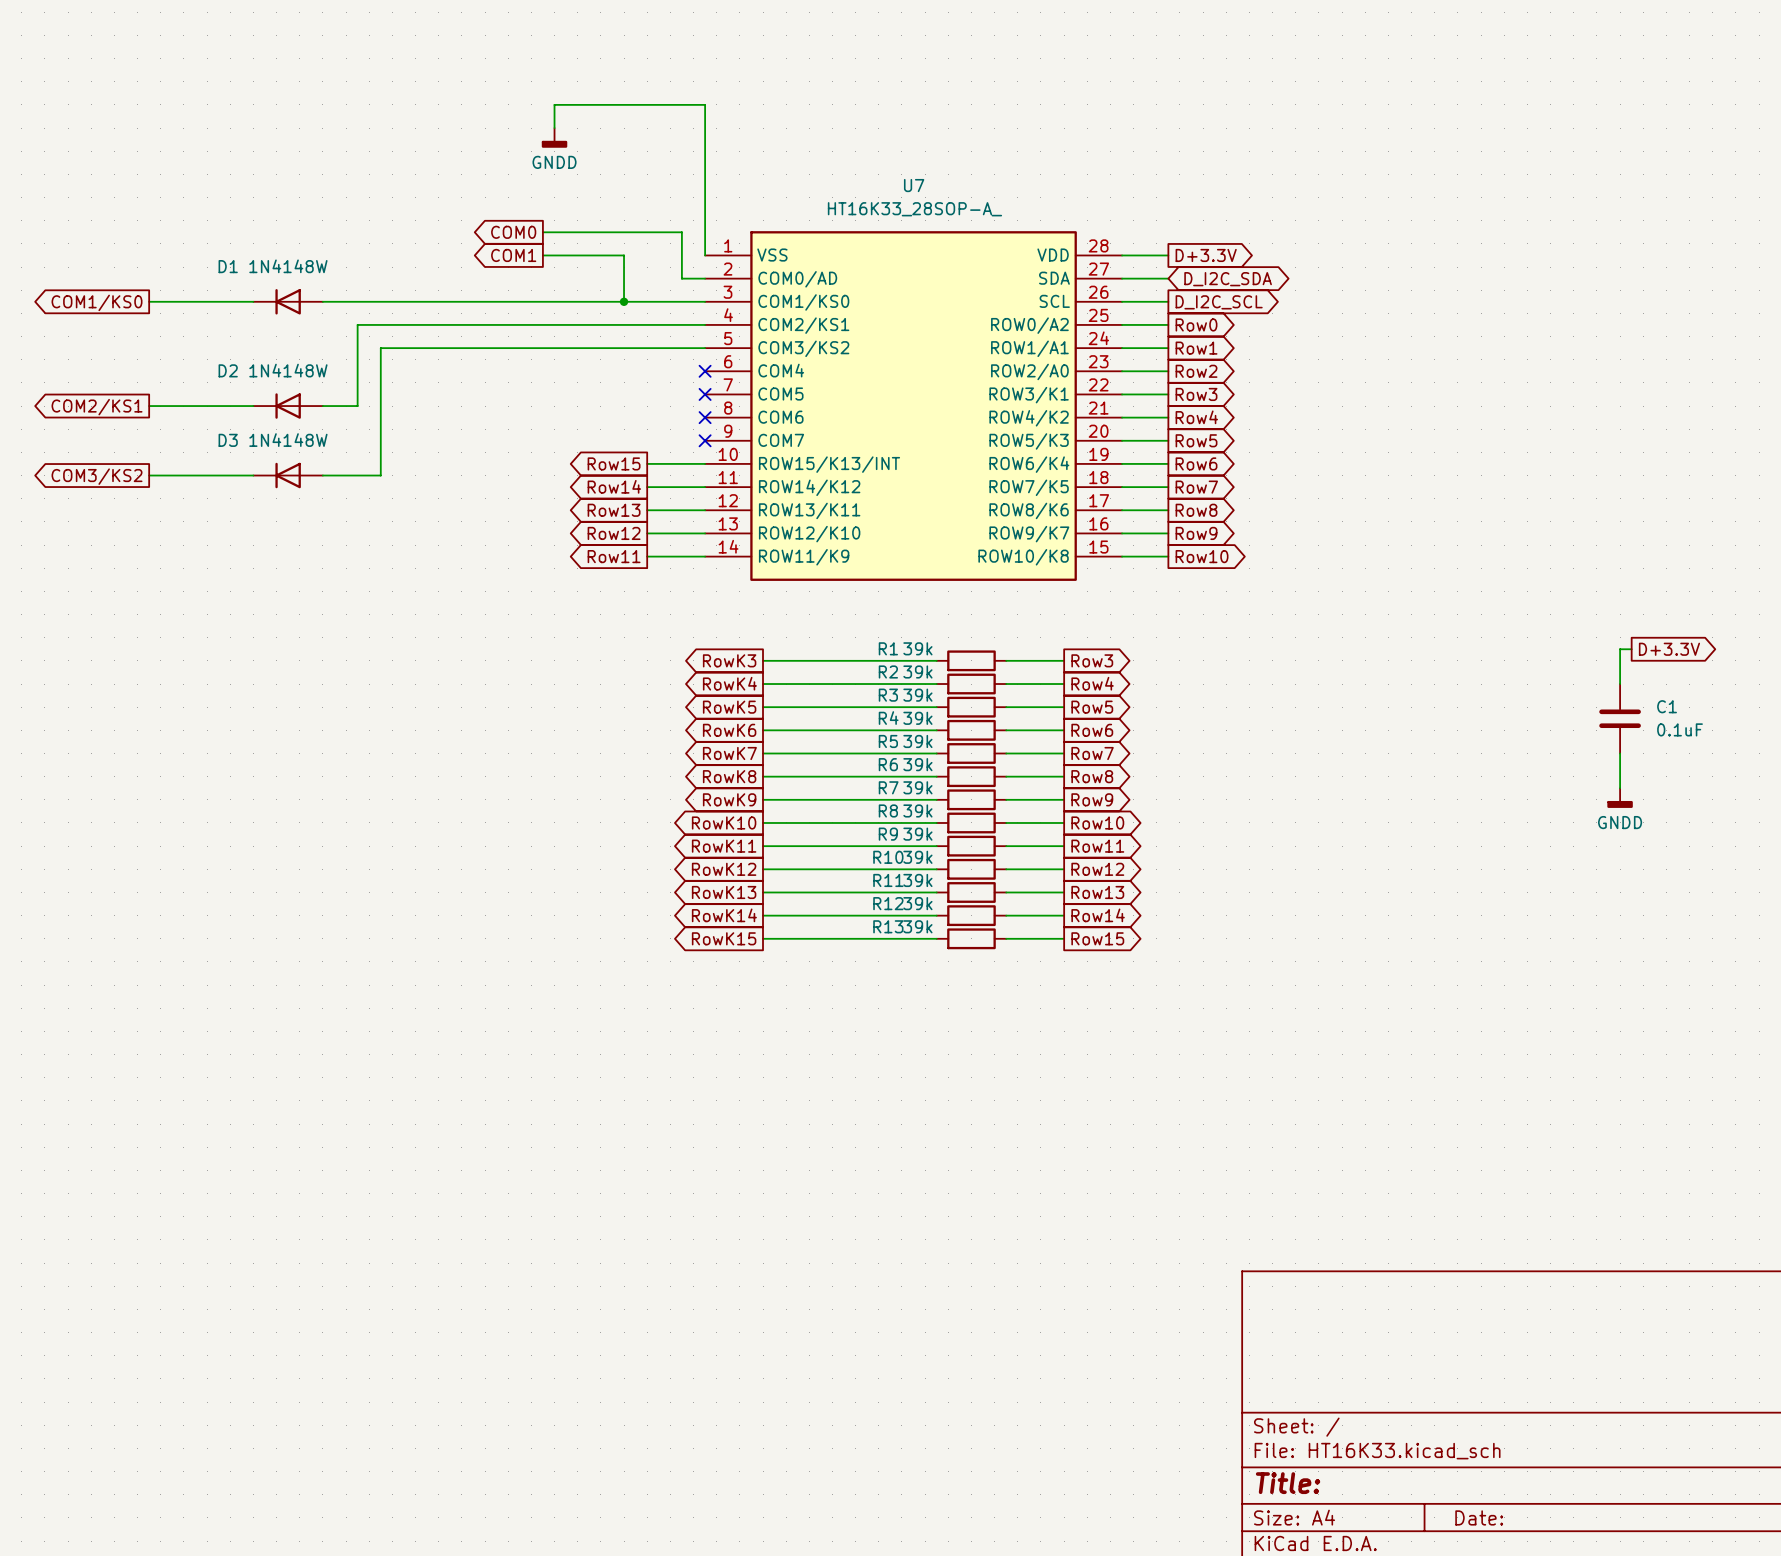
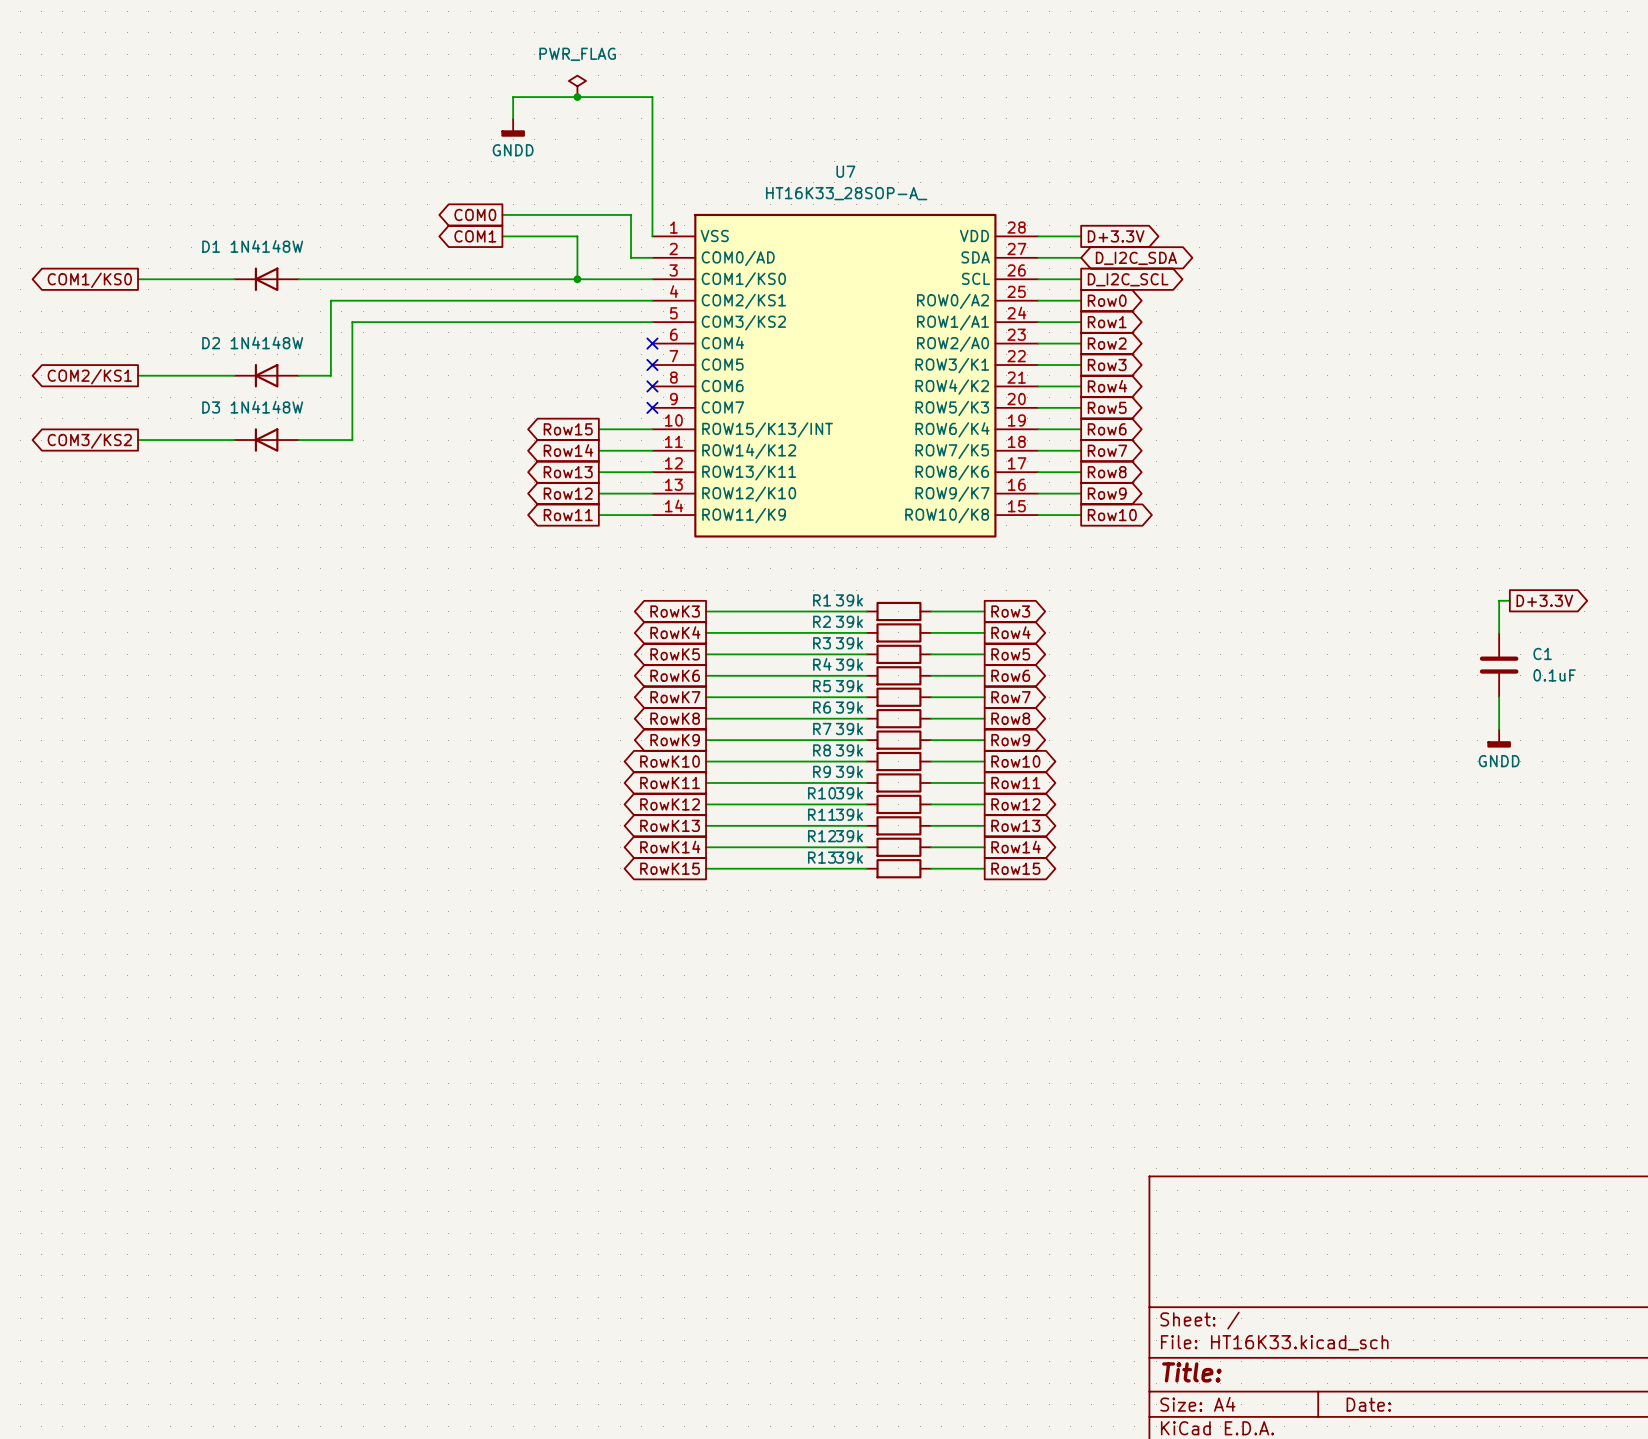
power symbol: none -> PWR_FLAG (577, 86)
junction: none -> (577, 97)

